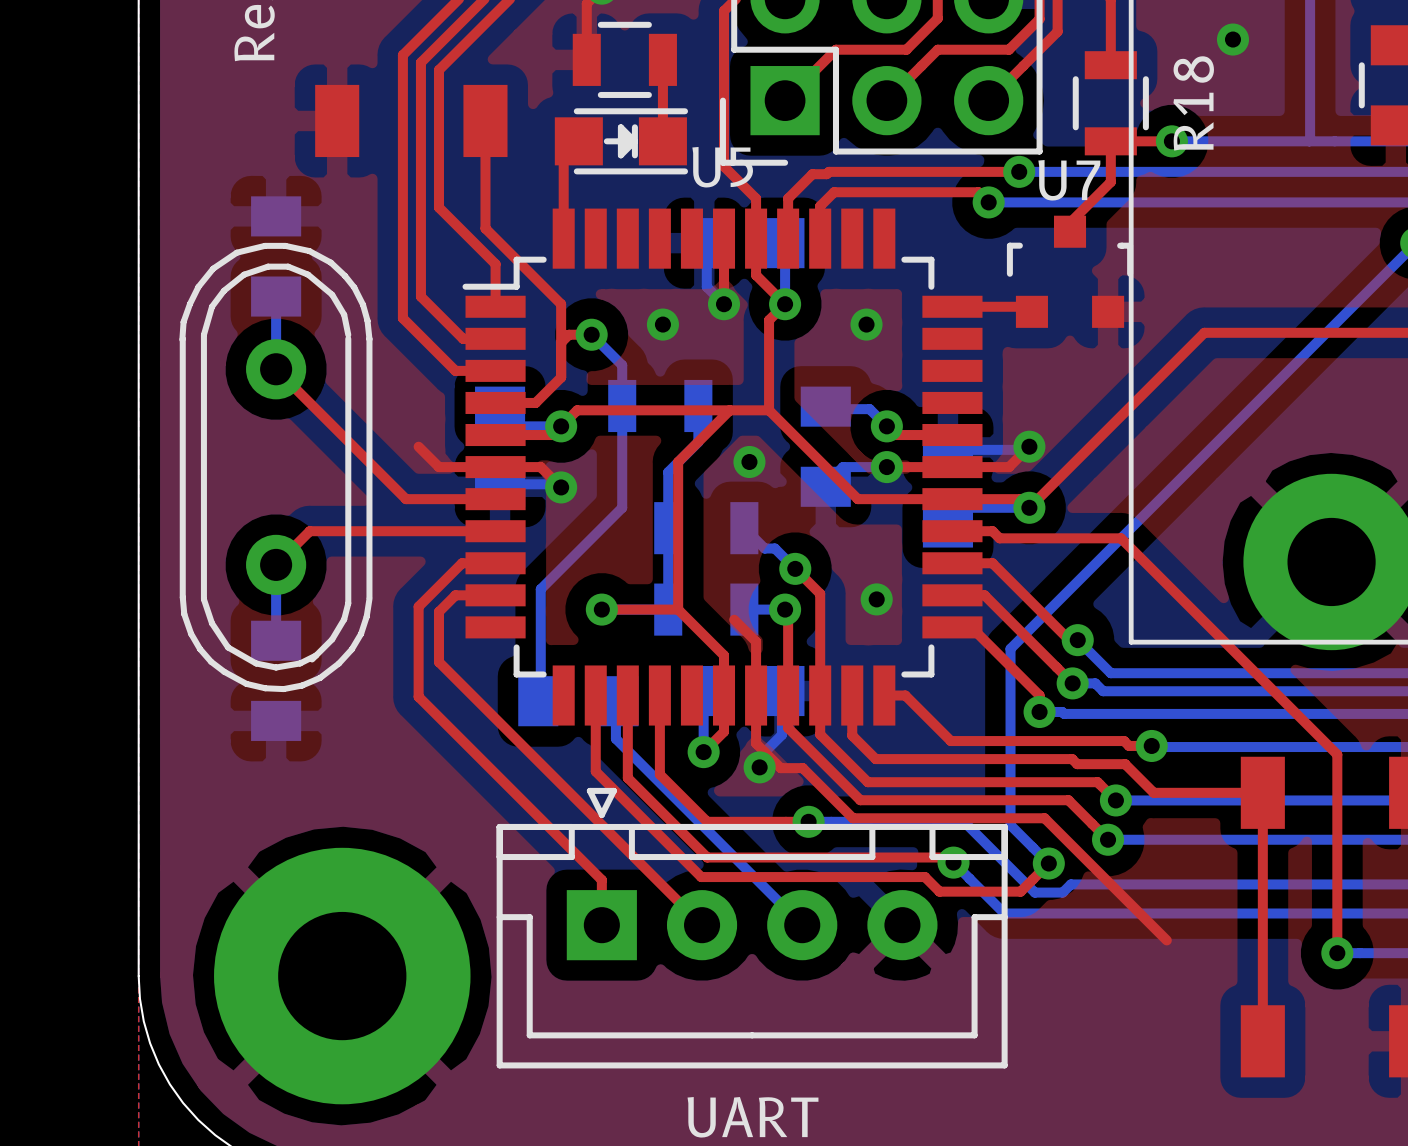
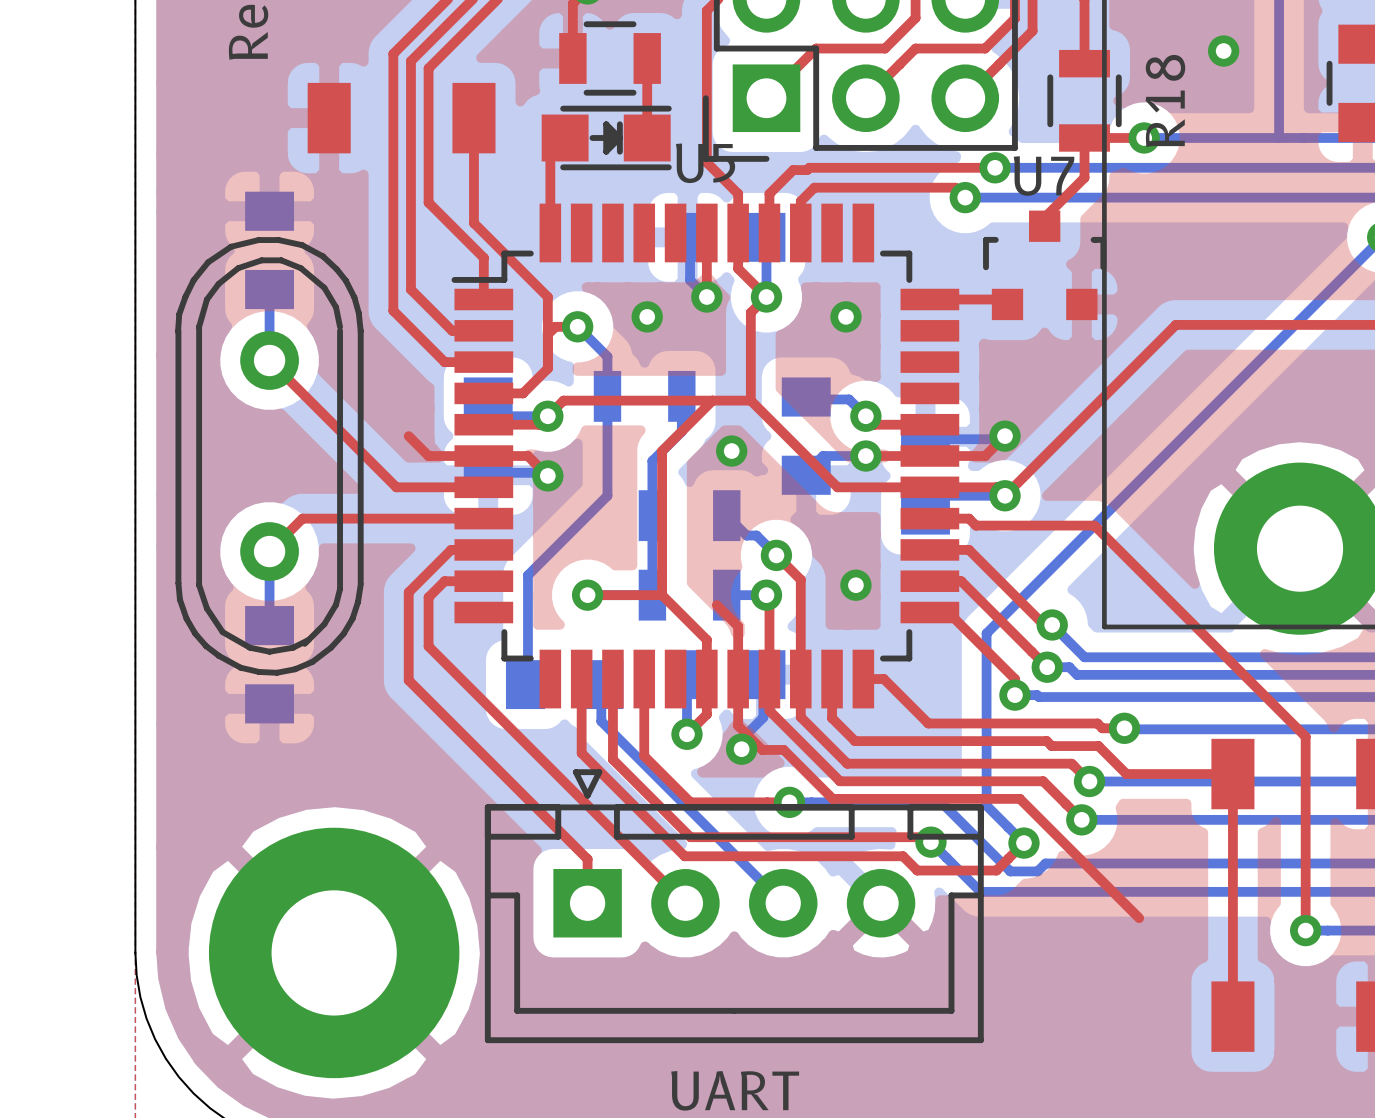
via position: (1232, 39) -> (1223, 51)

